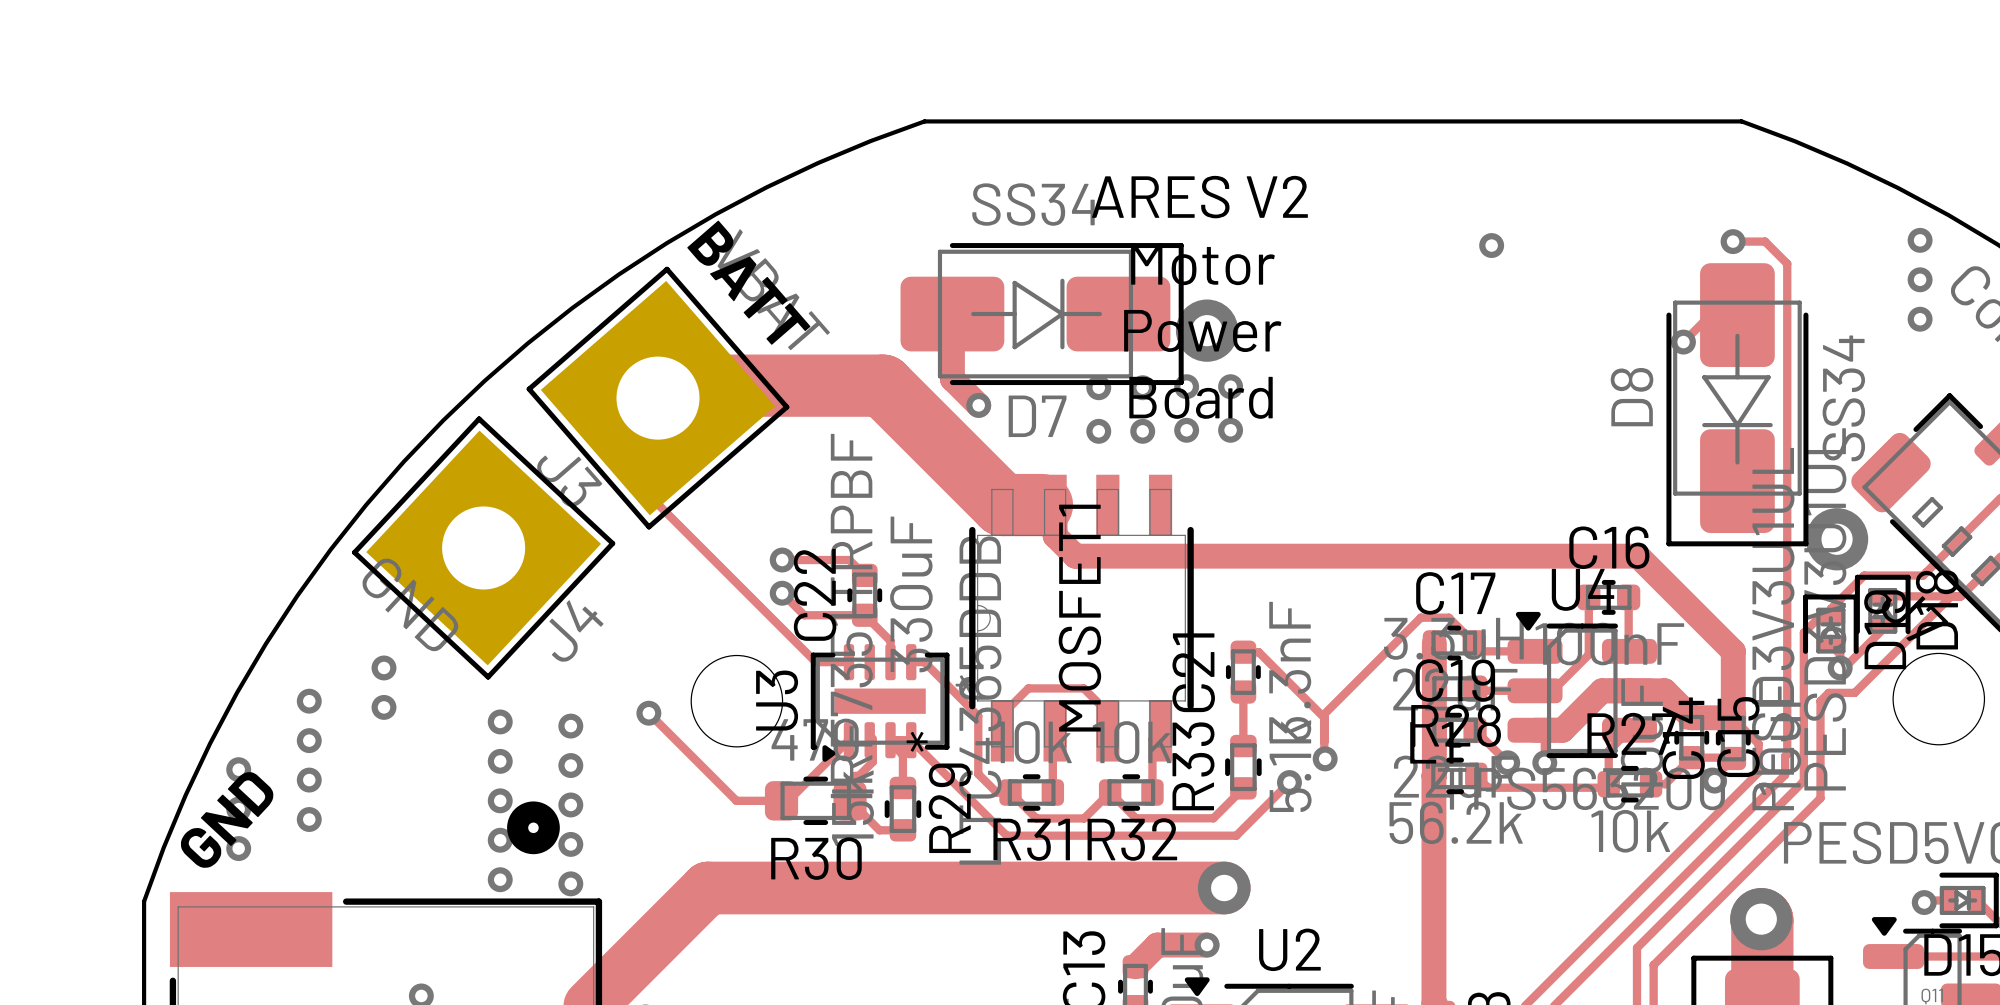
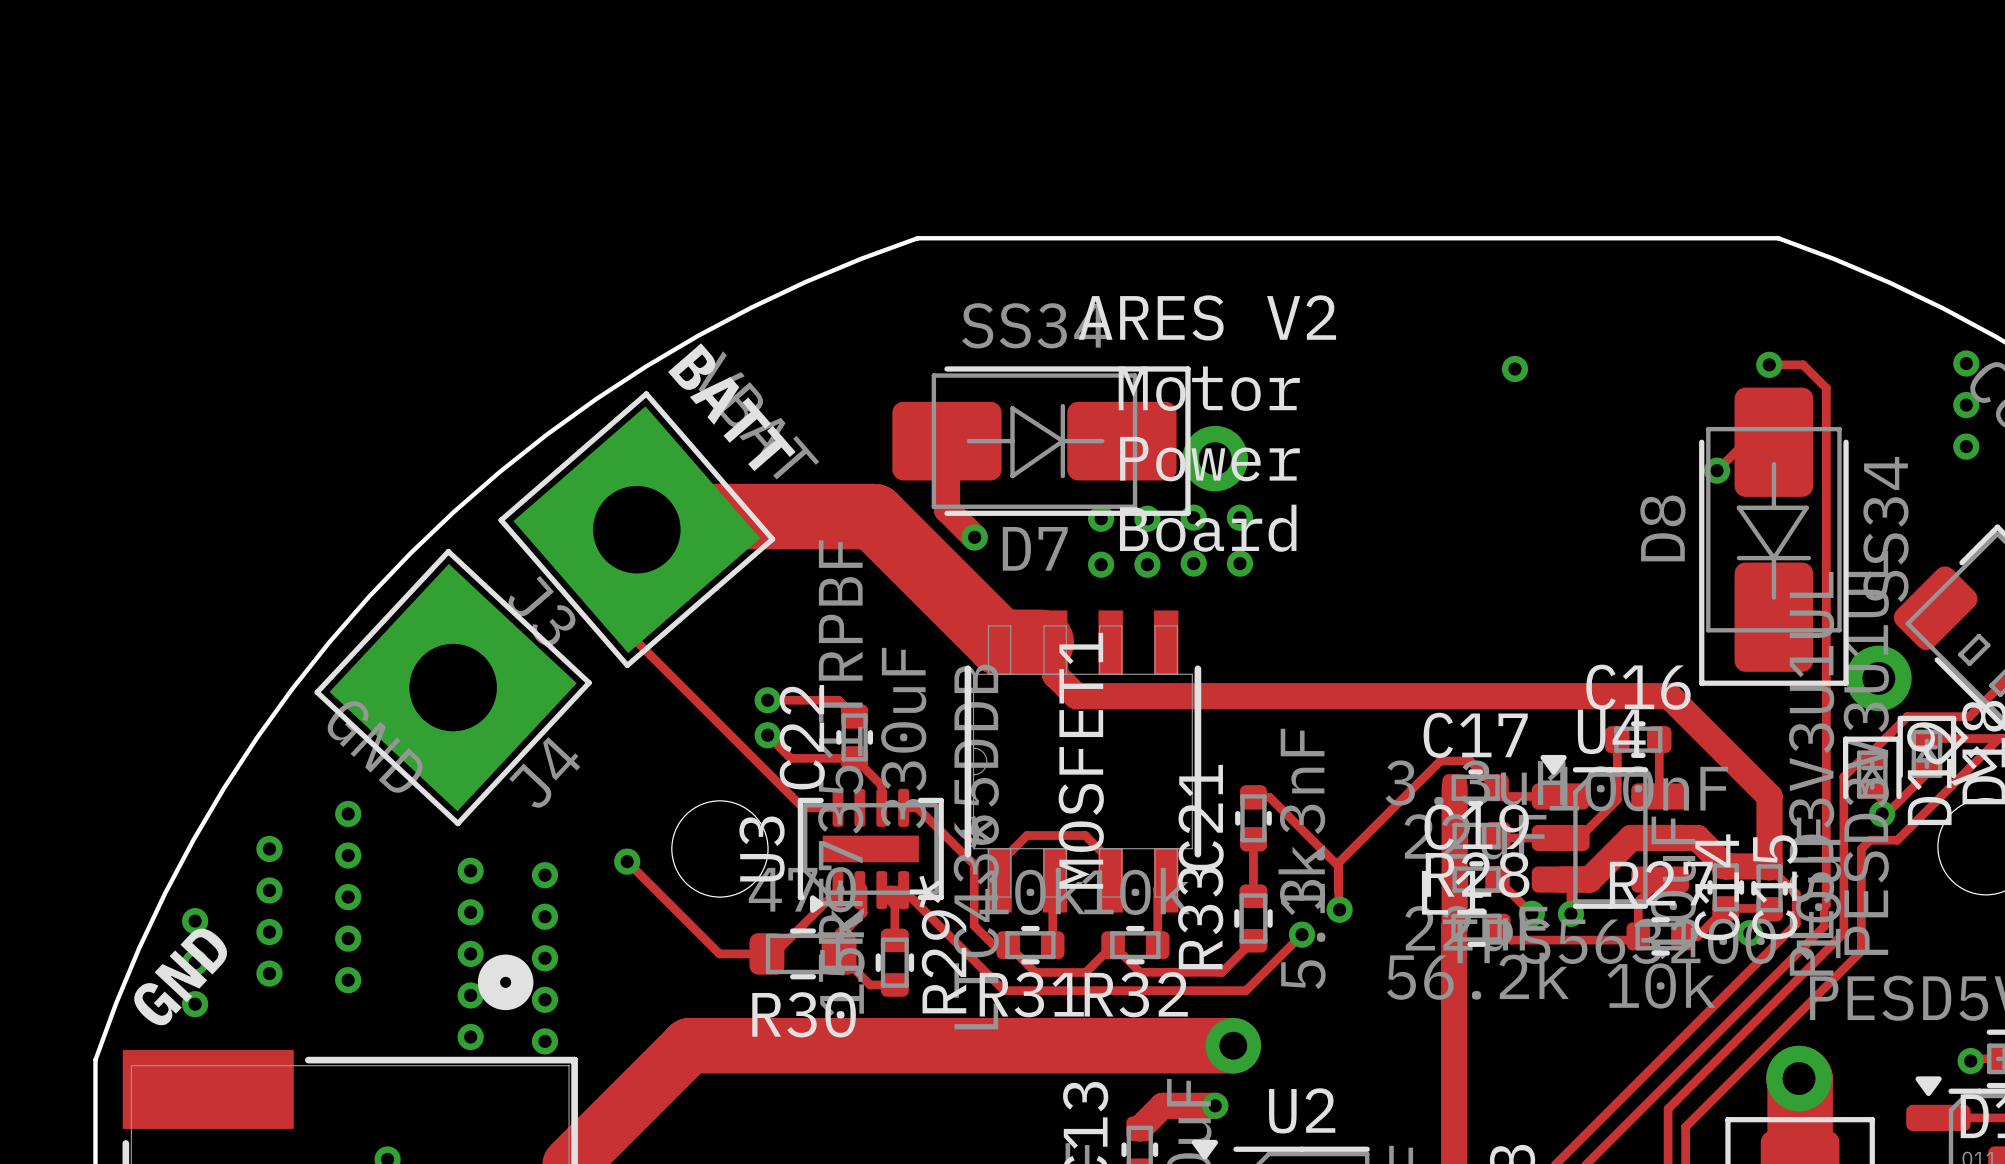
via: none -> (348, 897)
via: none -> (348, 938)
via: none -> (348, 980)

